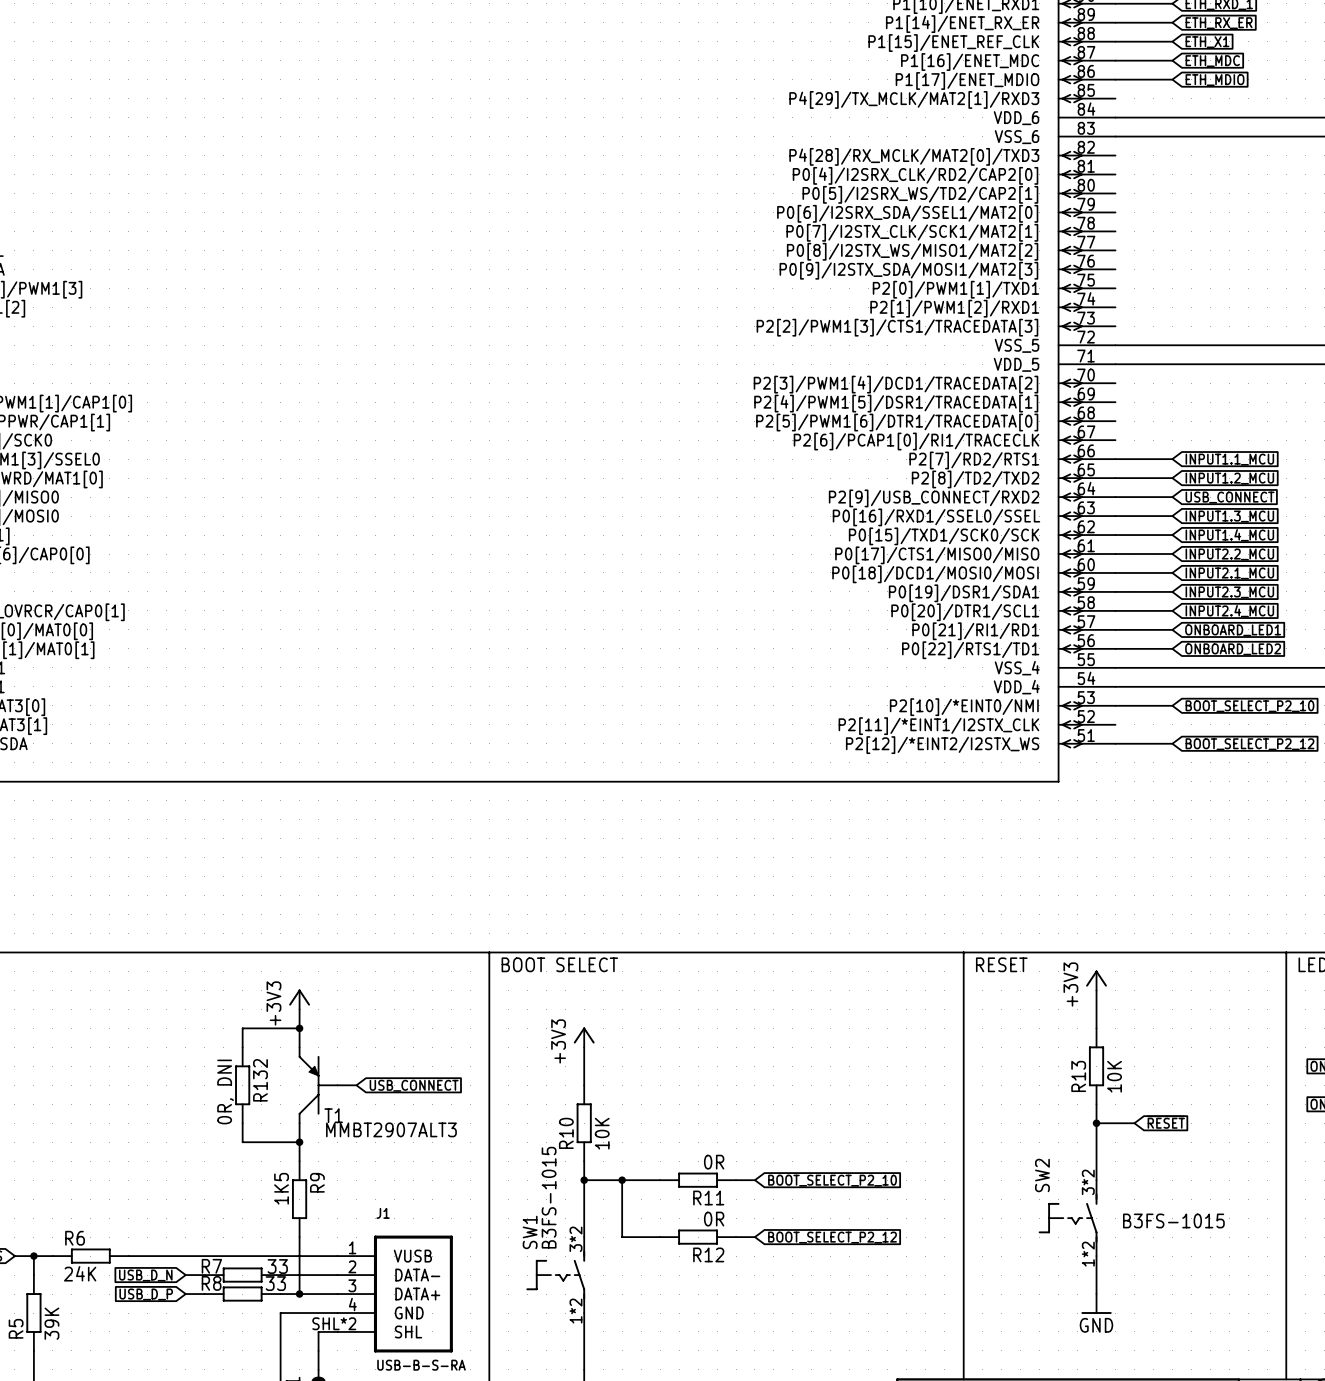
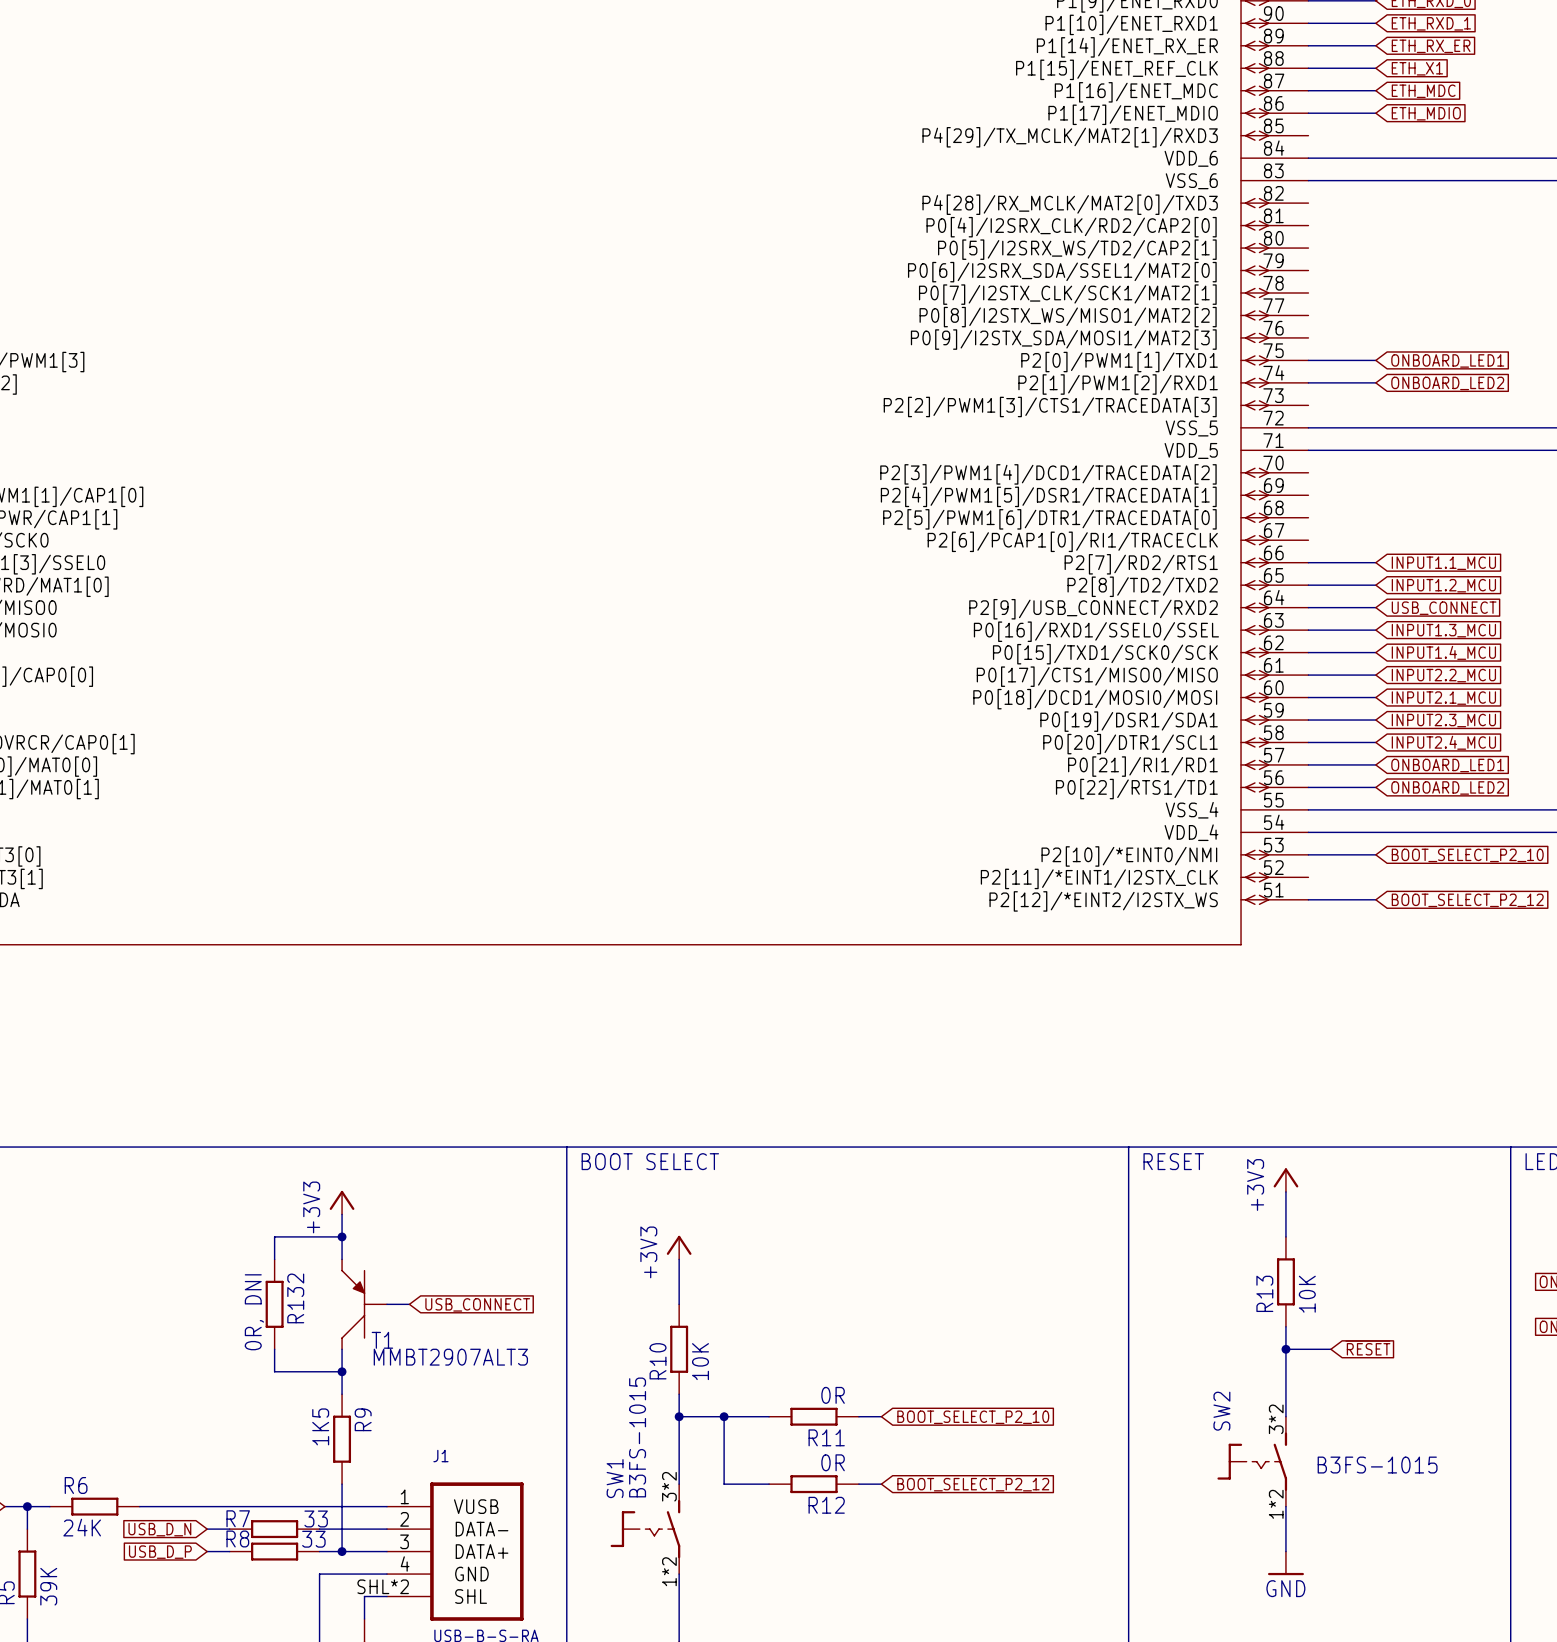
wire: none -> (1308, 360) (1375, 360)
global label: none -> ONBOARD_LED1 (1447, 360)
wire: none -> (1308, 382) (1375, 382)
global label: none -> ONBOARD_LED2 (1447, 383)

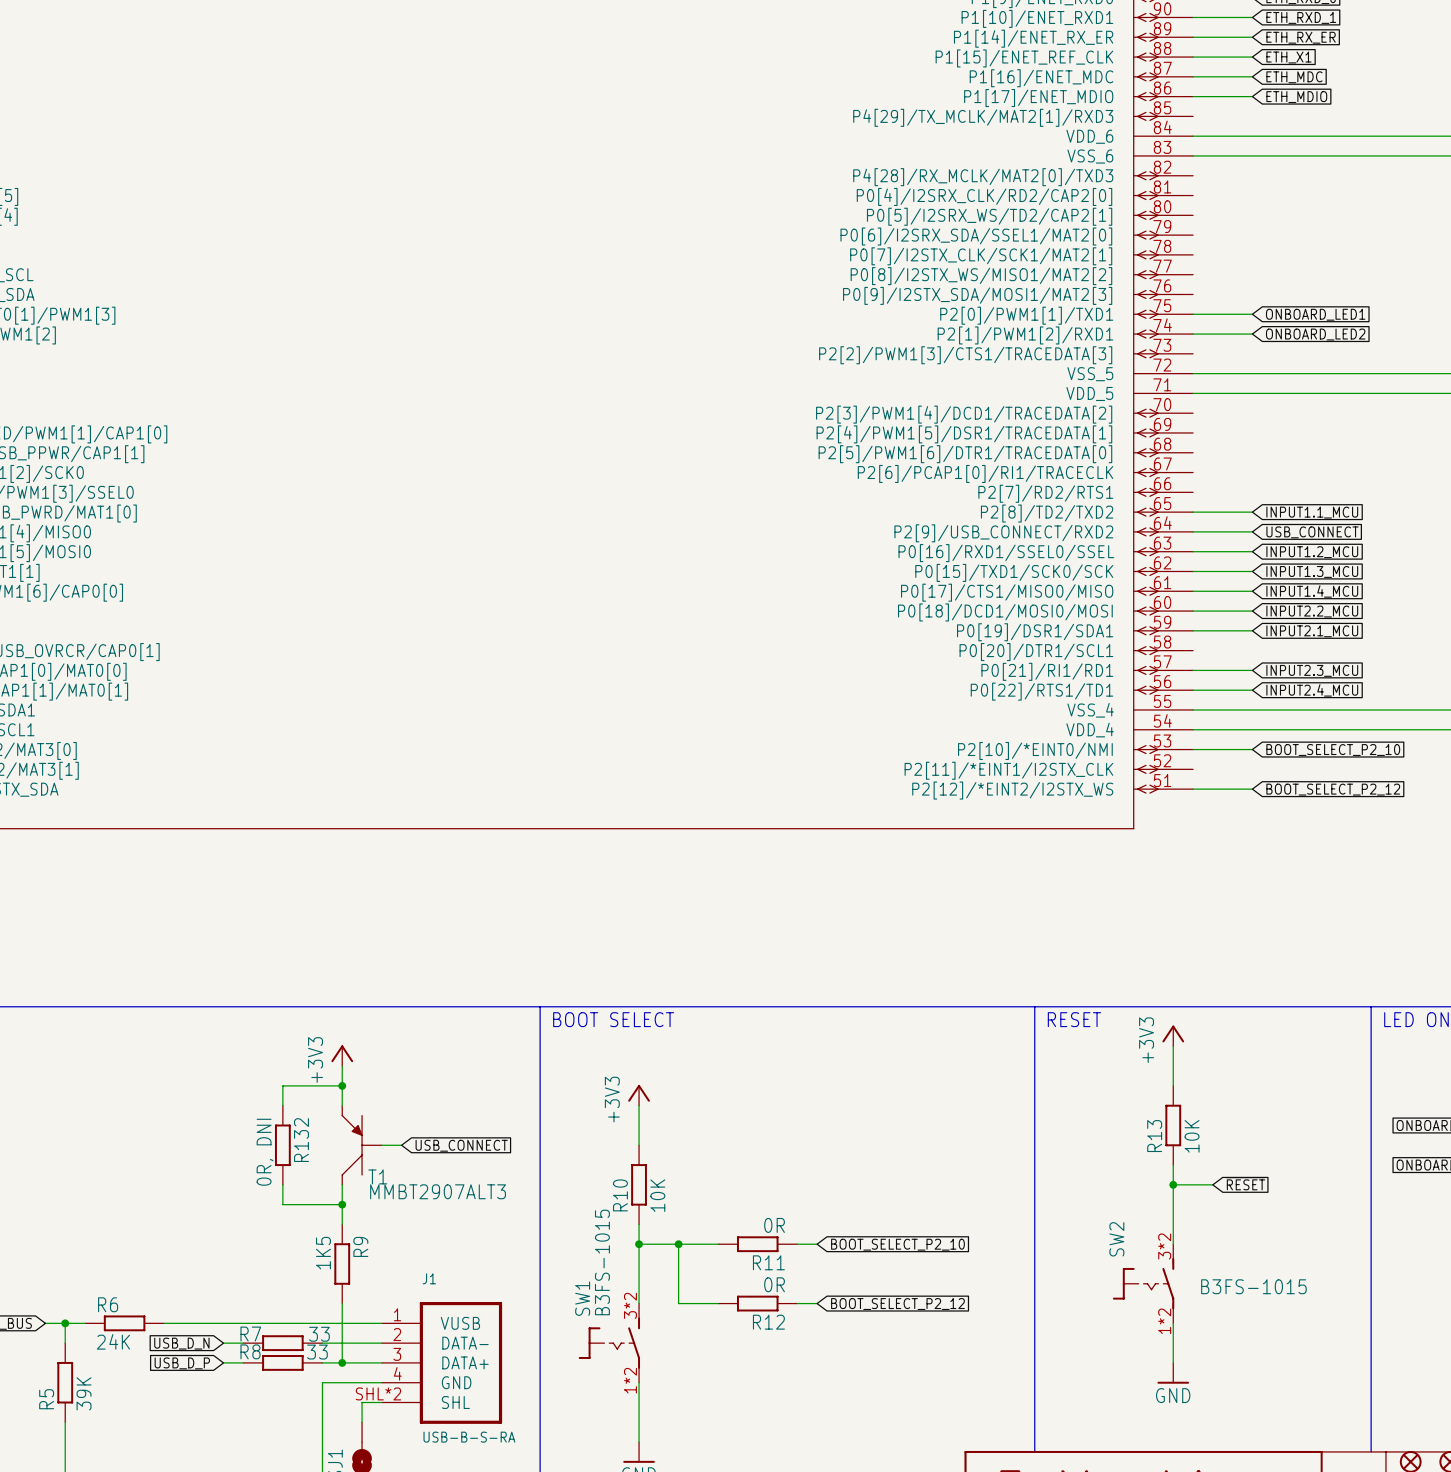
wire: (1308, 562) (1375, 562) -> none
global label: INPUT1.1_MCU (1443, 563) -> none
global label: INPUT1.2_MCU (1443, 585) -> INPUT1.1_MCU (1312, 512)
global label: INPUT1.3_MCU (1443, 630) -> INPUT1.2_MCU (1312, 552)
global label: INPUT1.4_MCU (1443, 652) -> INPUT1.3_MCU (1312, 571)
global label: INPUT2.2_MCU (1443, 675) -> INPUT1.4_MCU (1312, 591)
global label: INPUT2.1_MCU (1443, 698) -> INPUT2.2_MCU (1312, 611)
global label: INPUT2.3_MCU (1443, 720) -> INPUT2.1_MCU (1312, 631)
wire: (1308, 742) (1375, 742) -> none
global label: INPUT2.4_MCU (1443, 742) -> none
global label: ONBOARD_LED1 (1447, 765) -> INPUT2.3_MCU (1312, 670)
global label: ONBOARD_LED2 (1447, 787) -> INPUT2.4_MCU (1312, 690)

